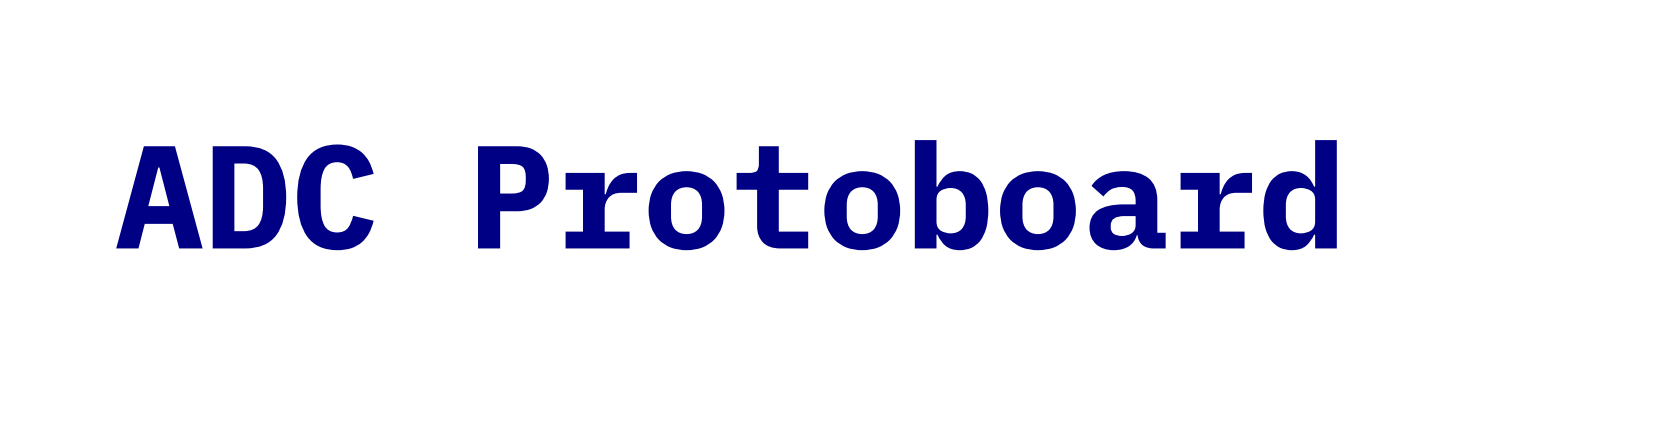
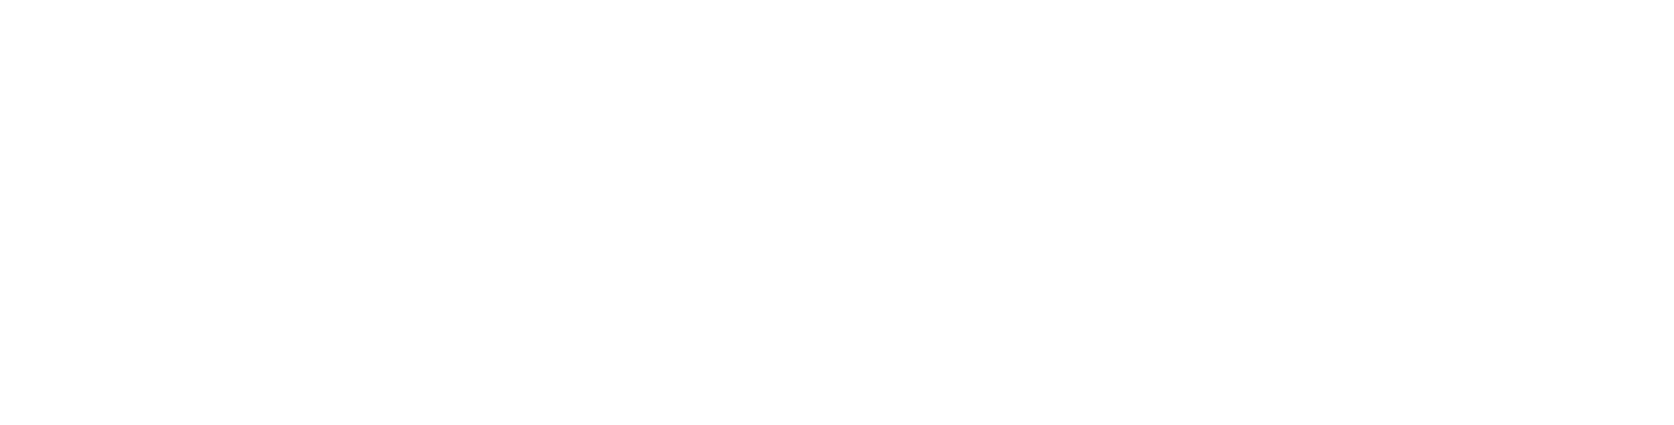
text: ADC Protoboard (726, 195) -> none

